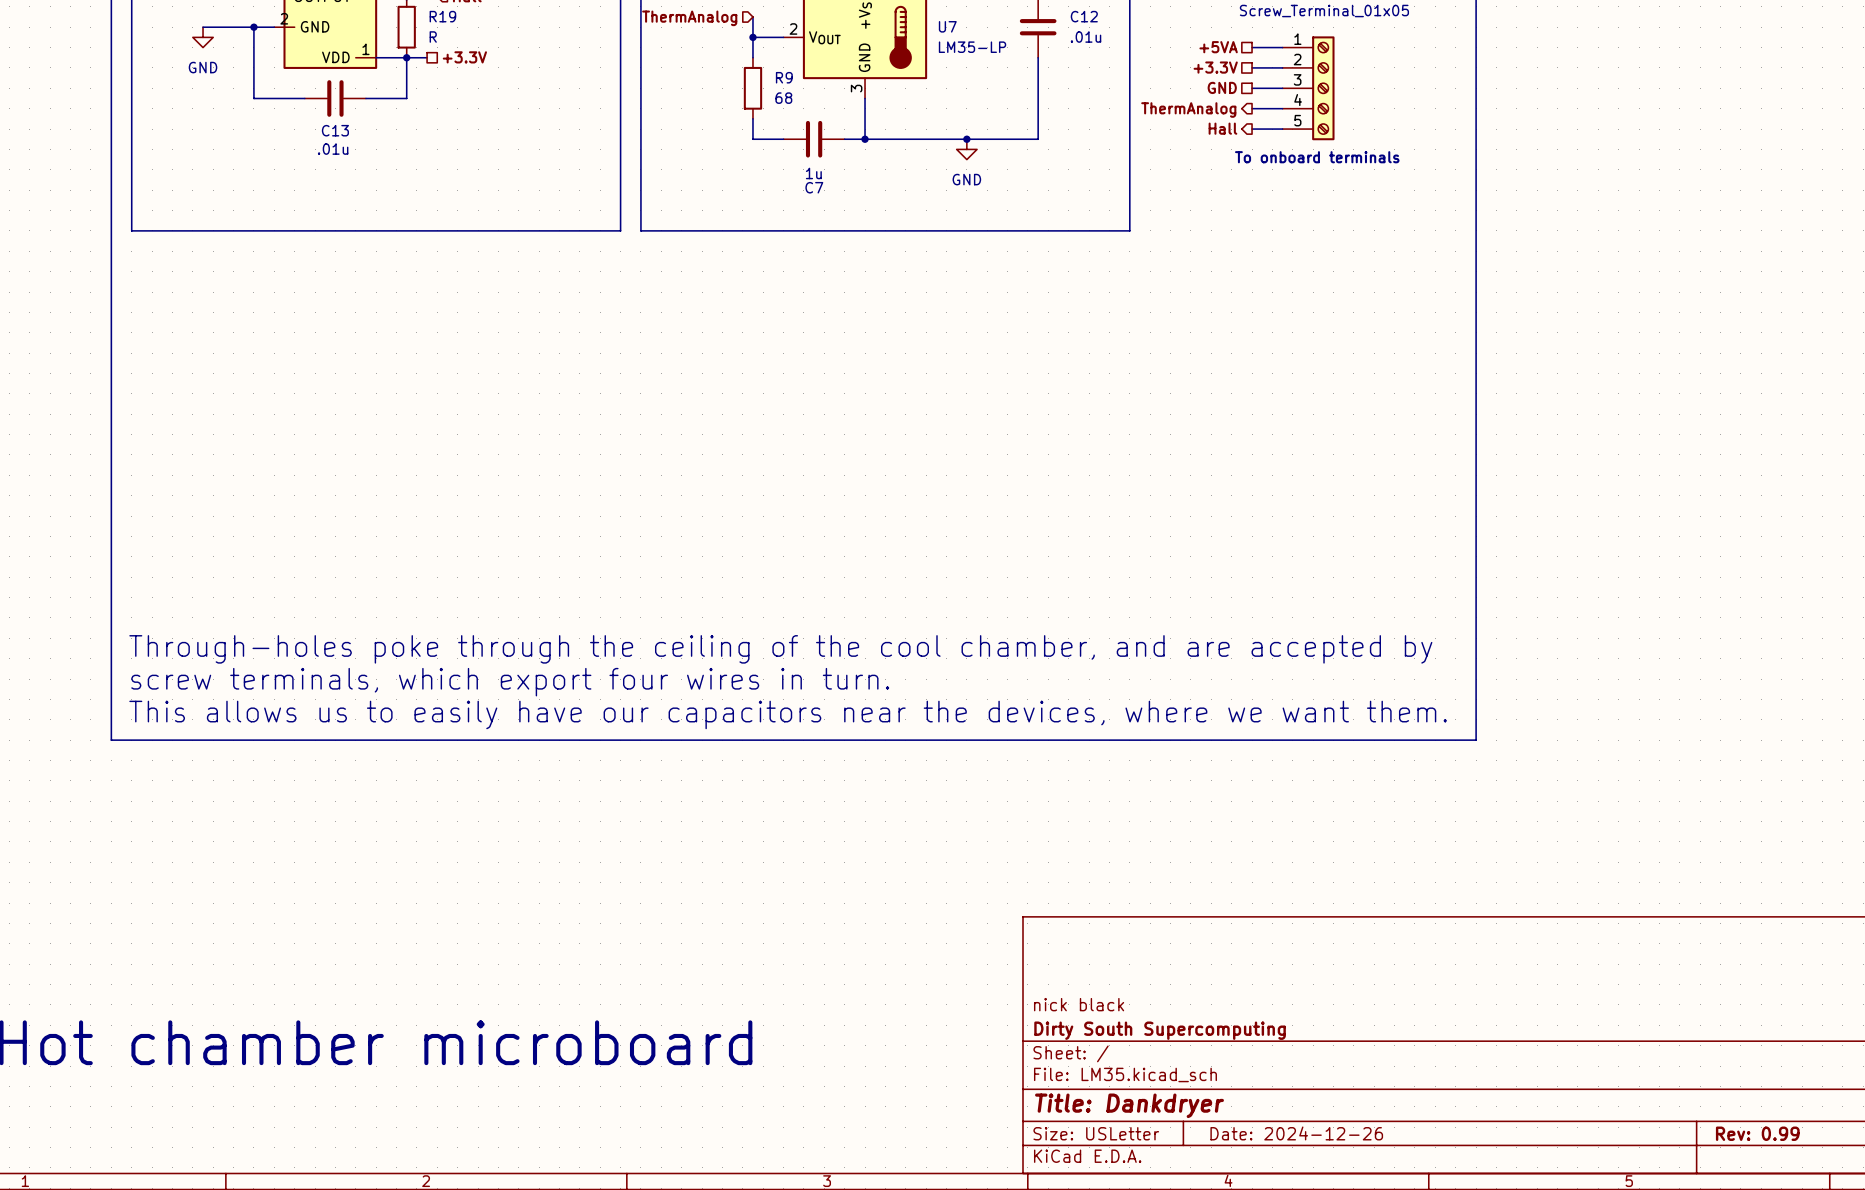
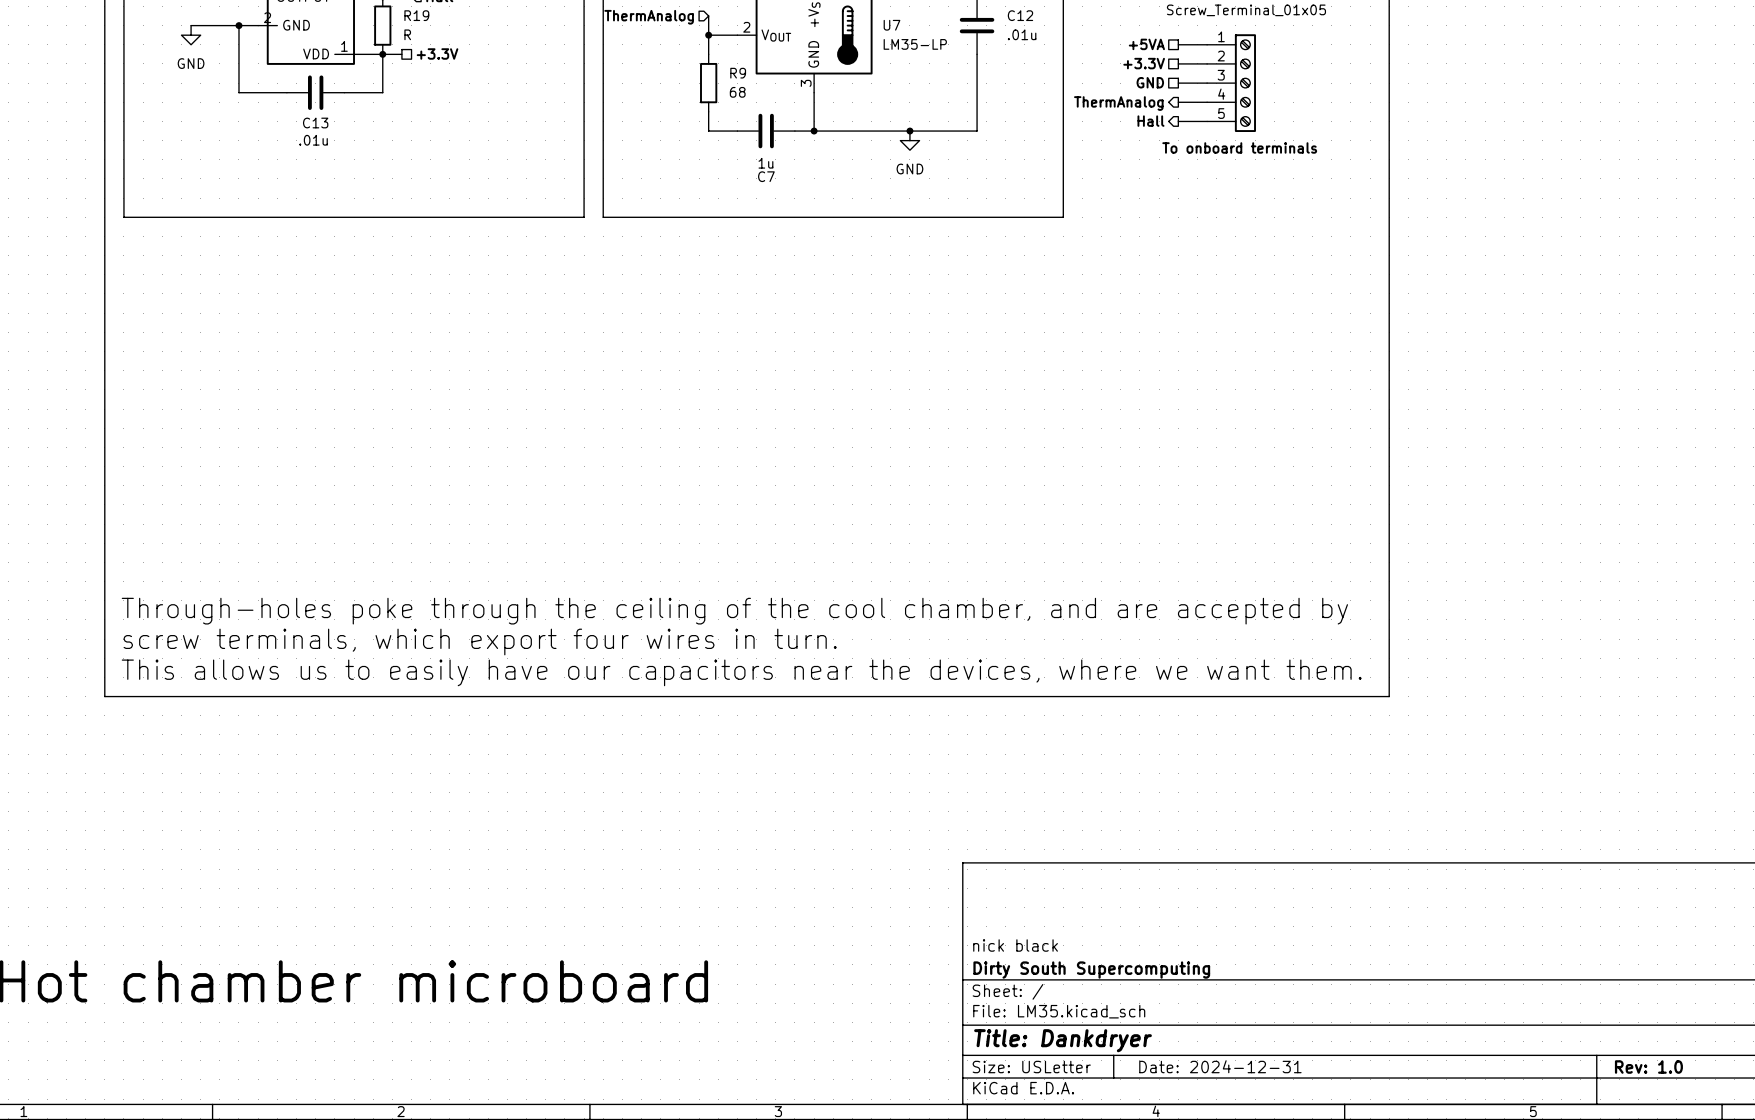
title block: Date: 2024-12-26 (1296, 1133) -> Date: 2024-12-31 (1220, 1066)
title block: Rev: 0.99 (1757, 1133) -> Rev: 1.0 (1648, 1067)

